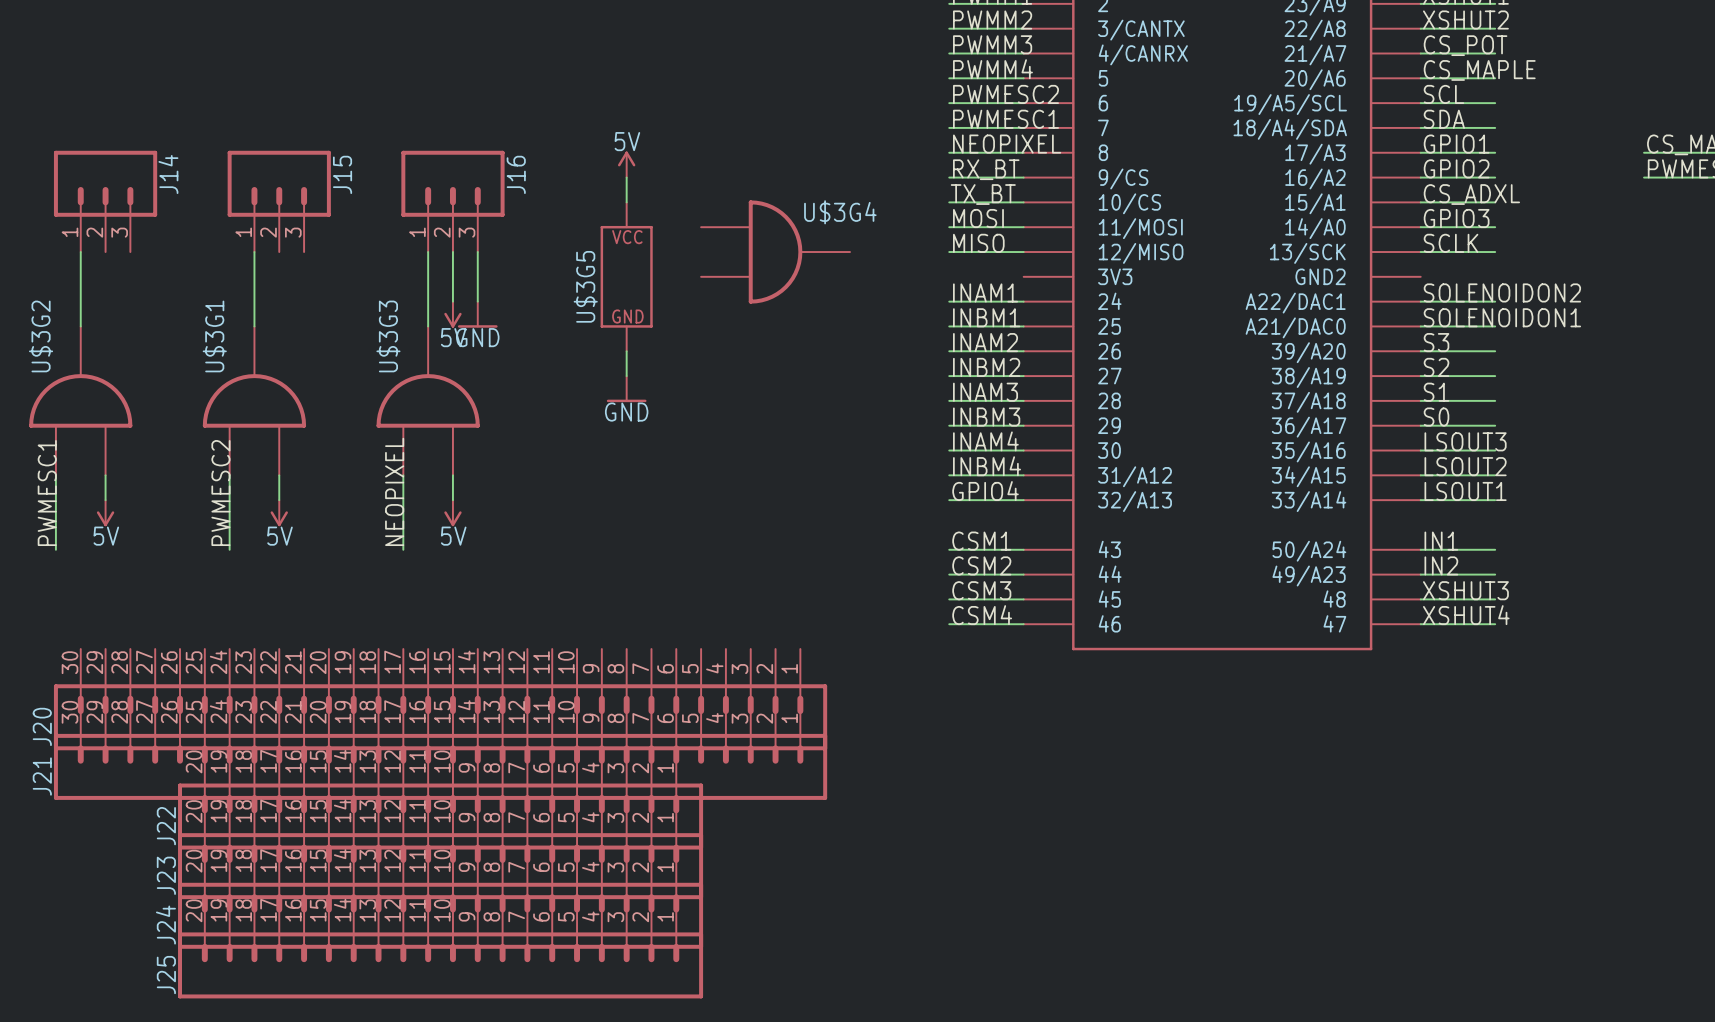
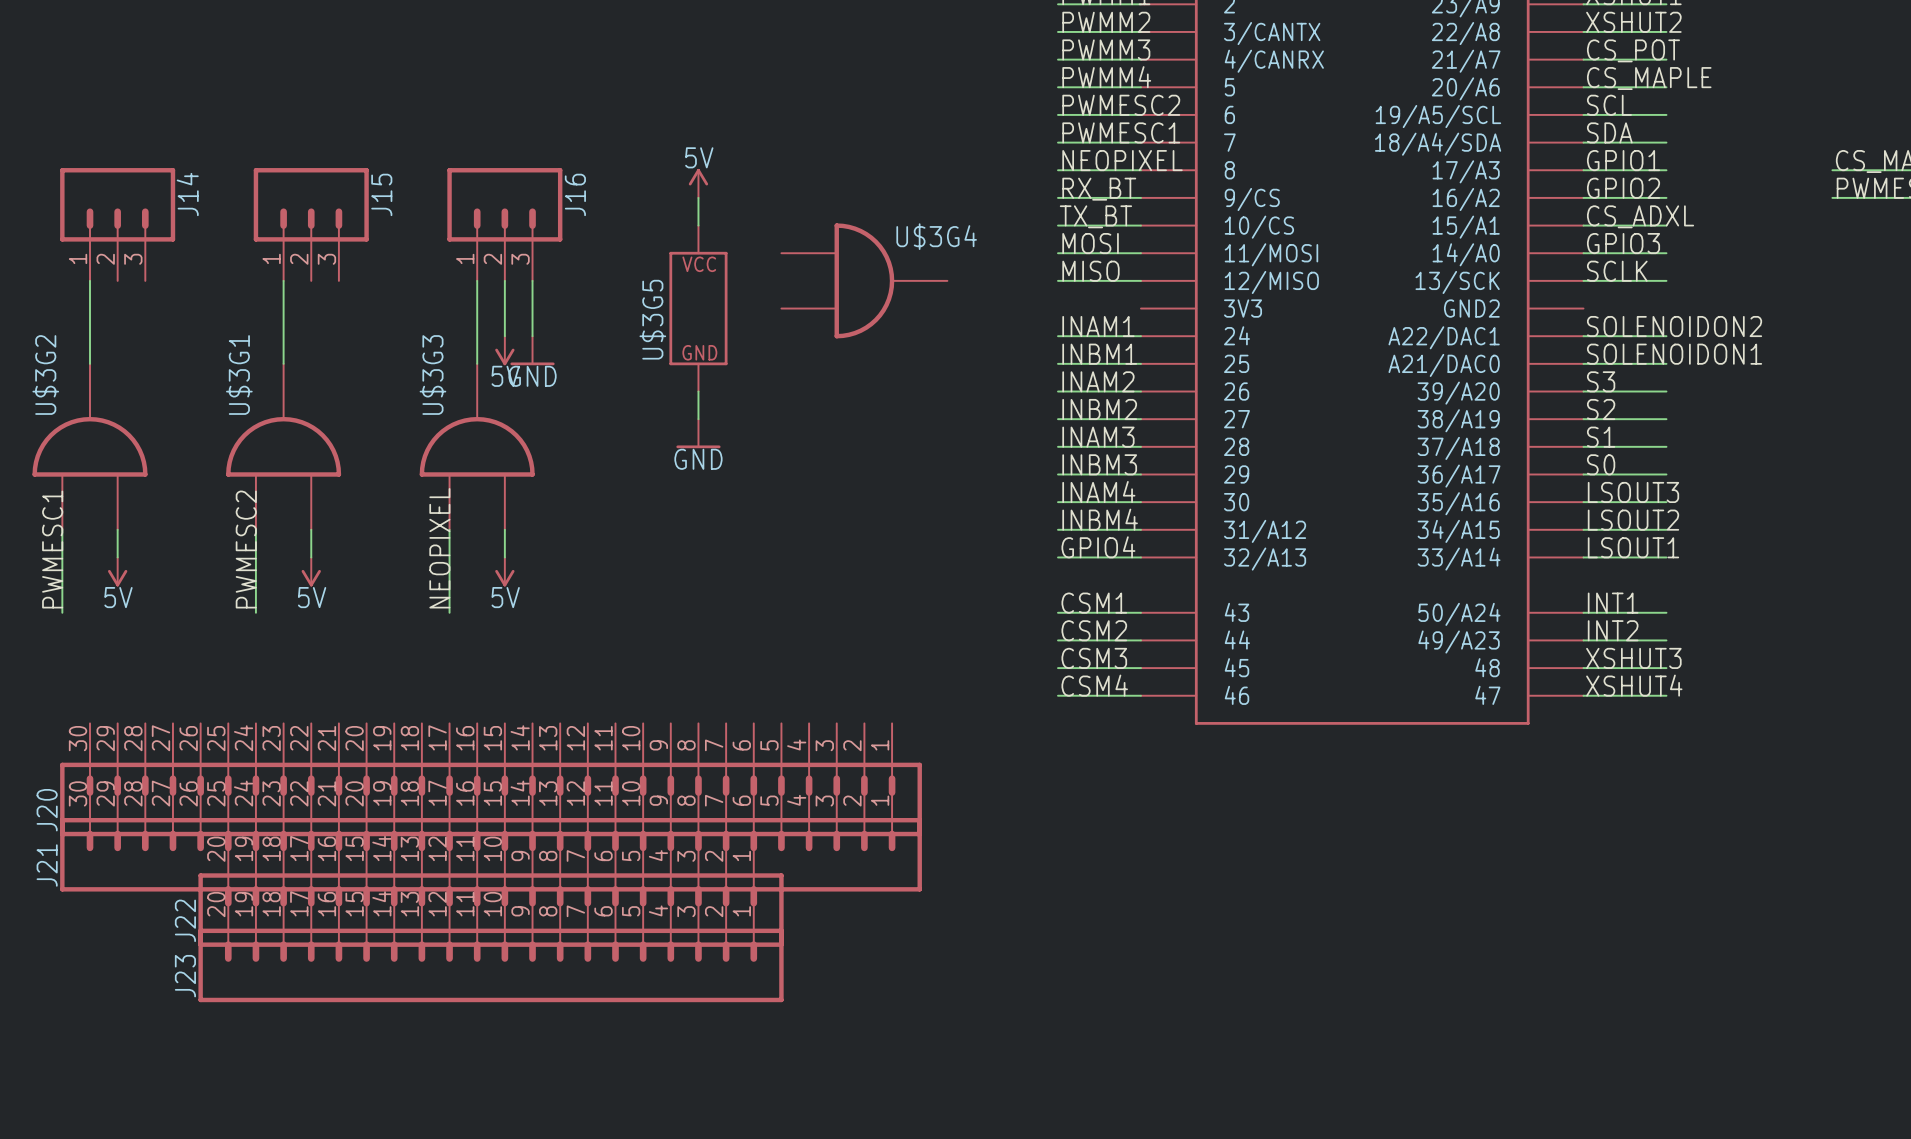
label: IN1 (1441, 541) -> INT1 (1613, 603)
label: IN2 (1441, 565) -> INT2 (1613, 630)
J24: (440, 898) -> none
J25: (440, 947) -> none

